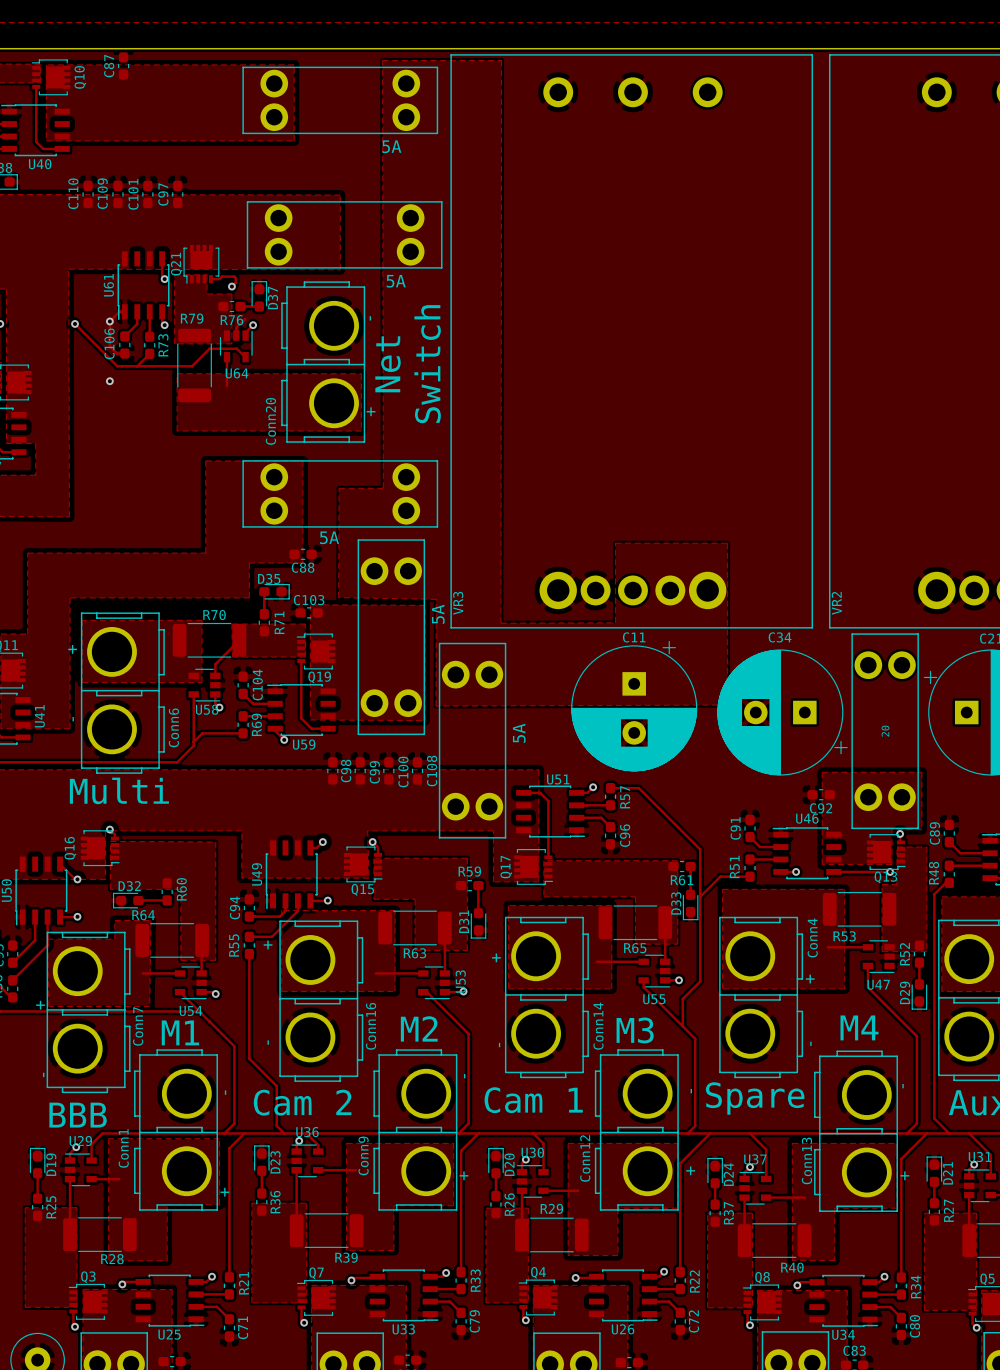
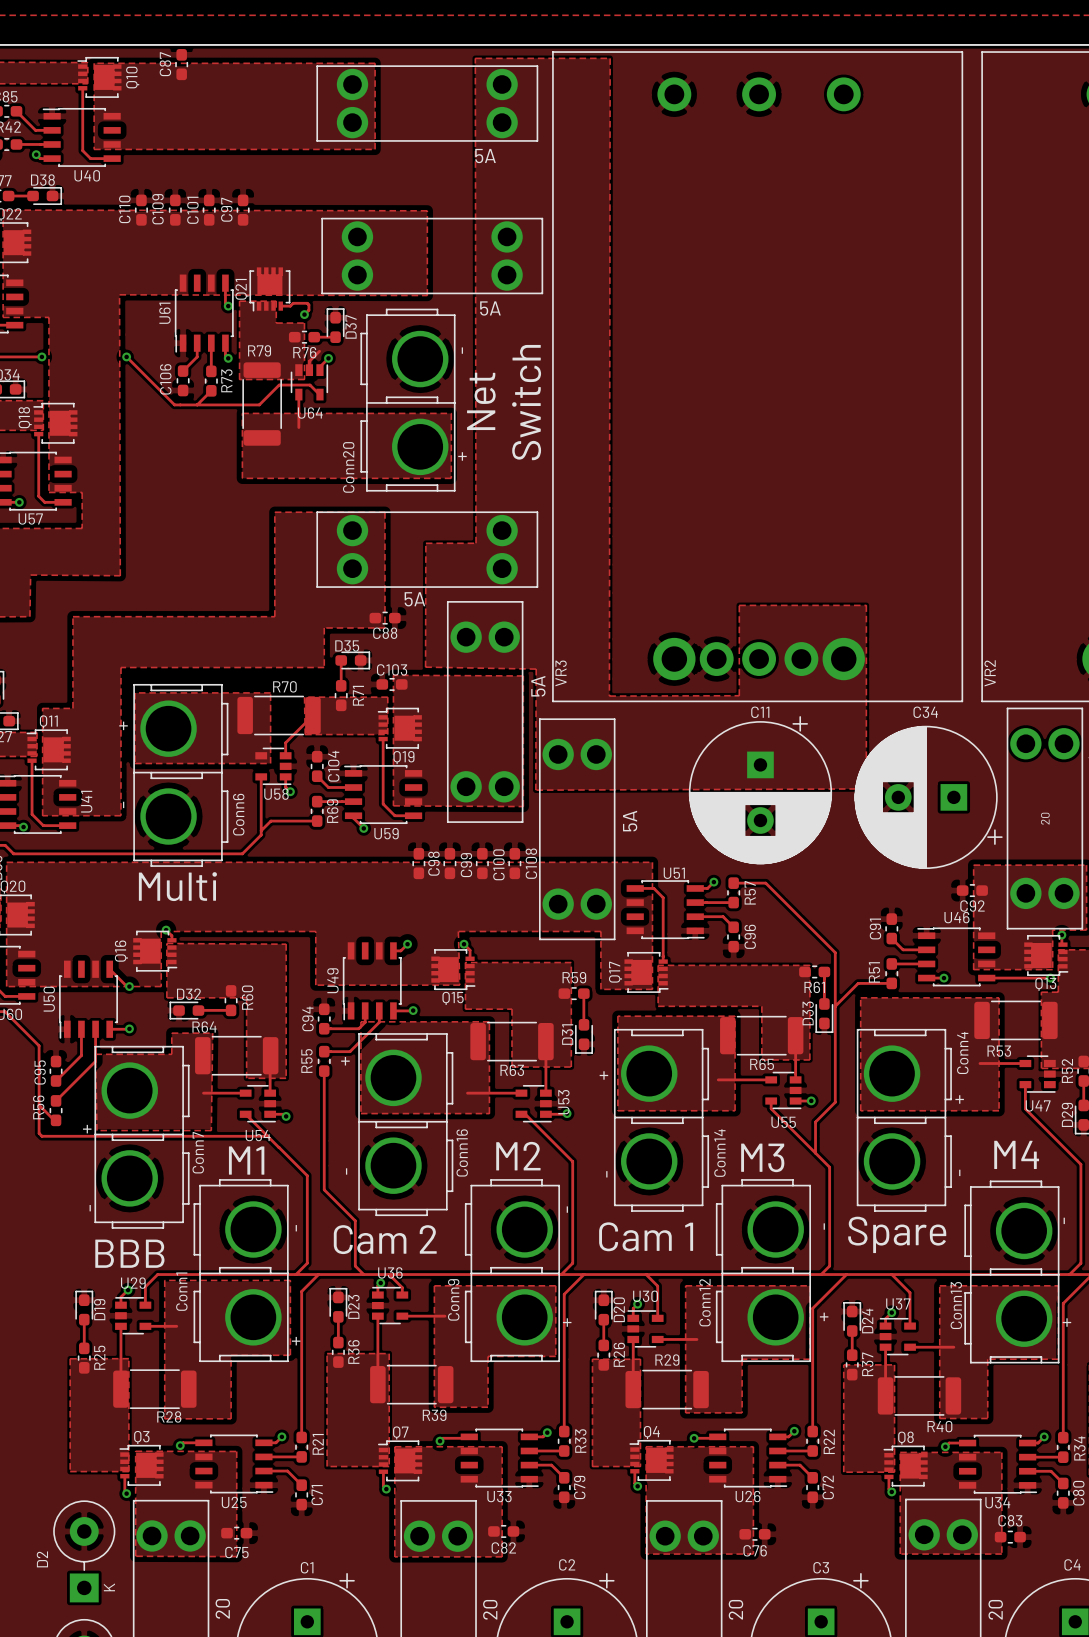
track: (124, 311) (119, 311) (109, 321) (109, 346) (117, 353) (124, 353) -> none
via: (109, 321) -> none
via: (109, 381) -> none

